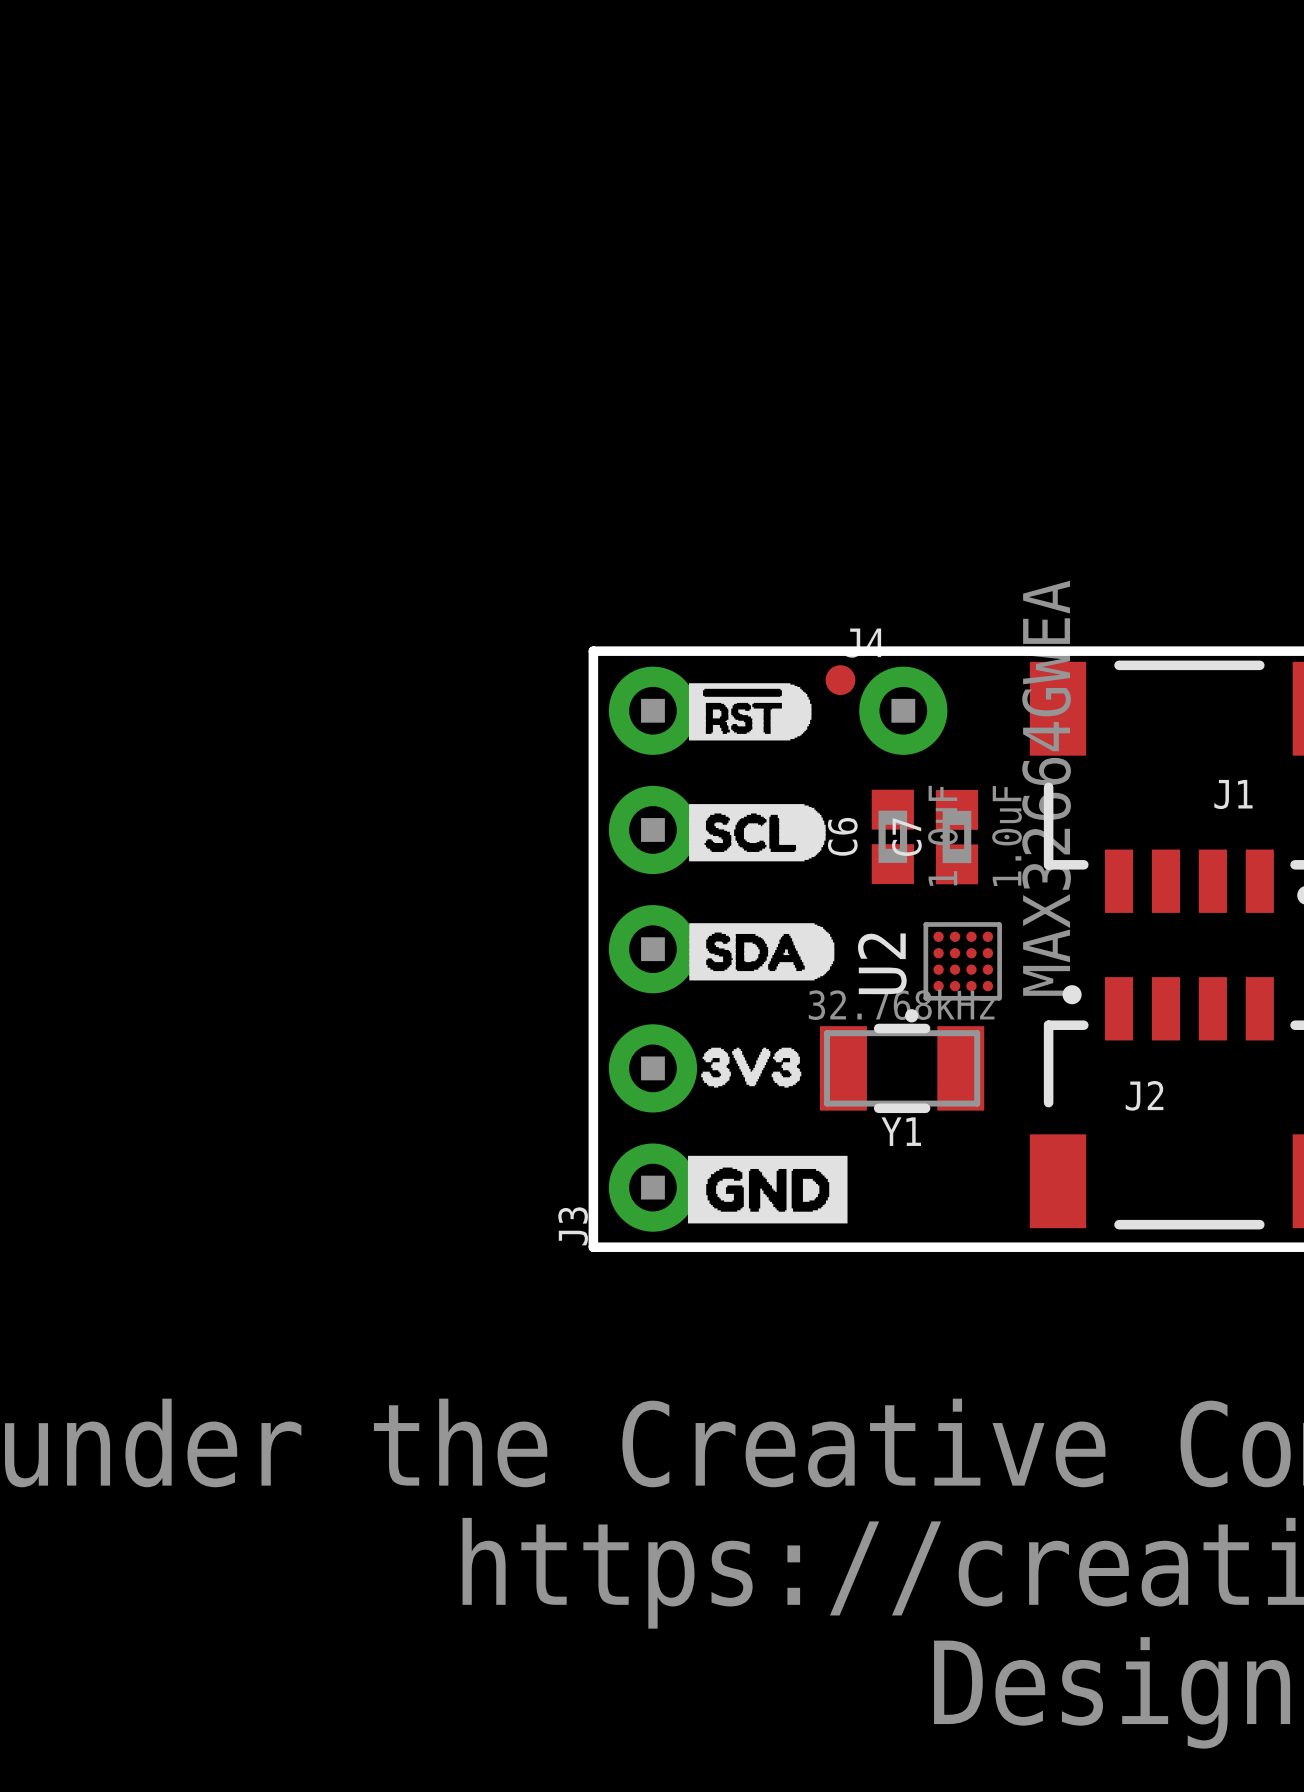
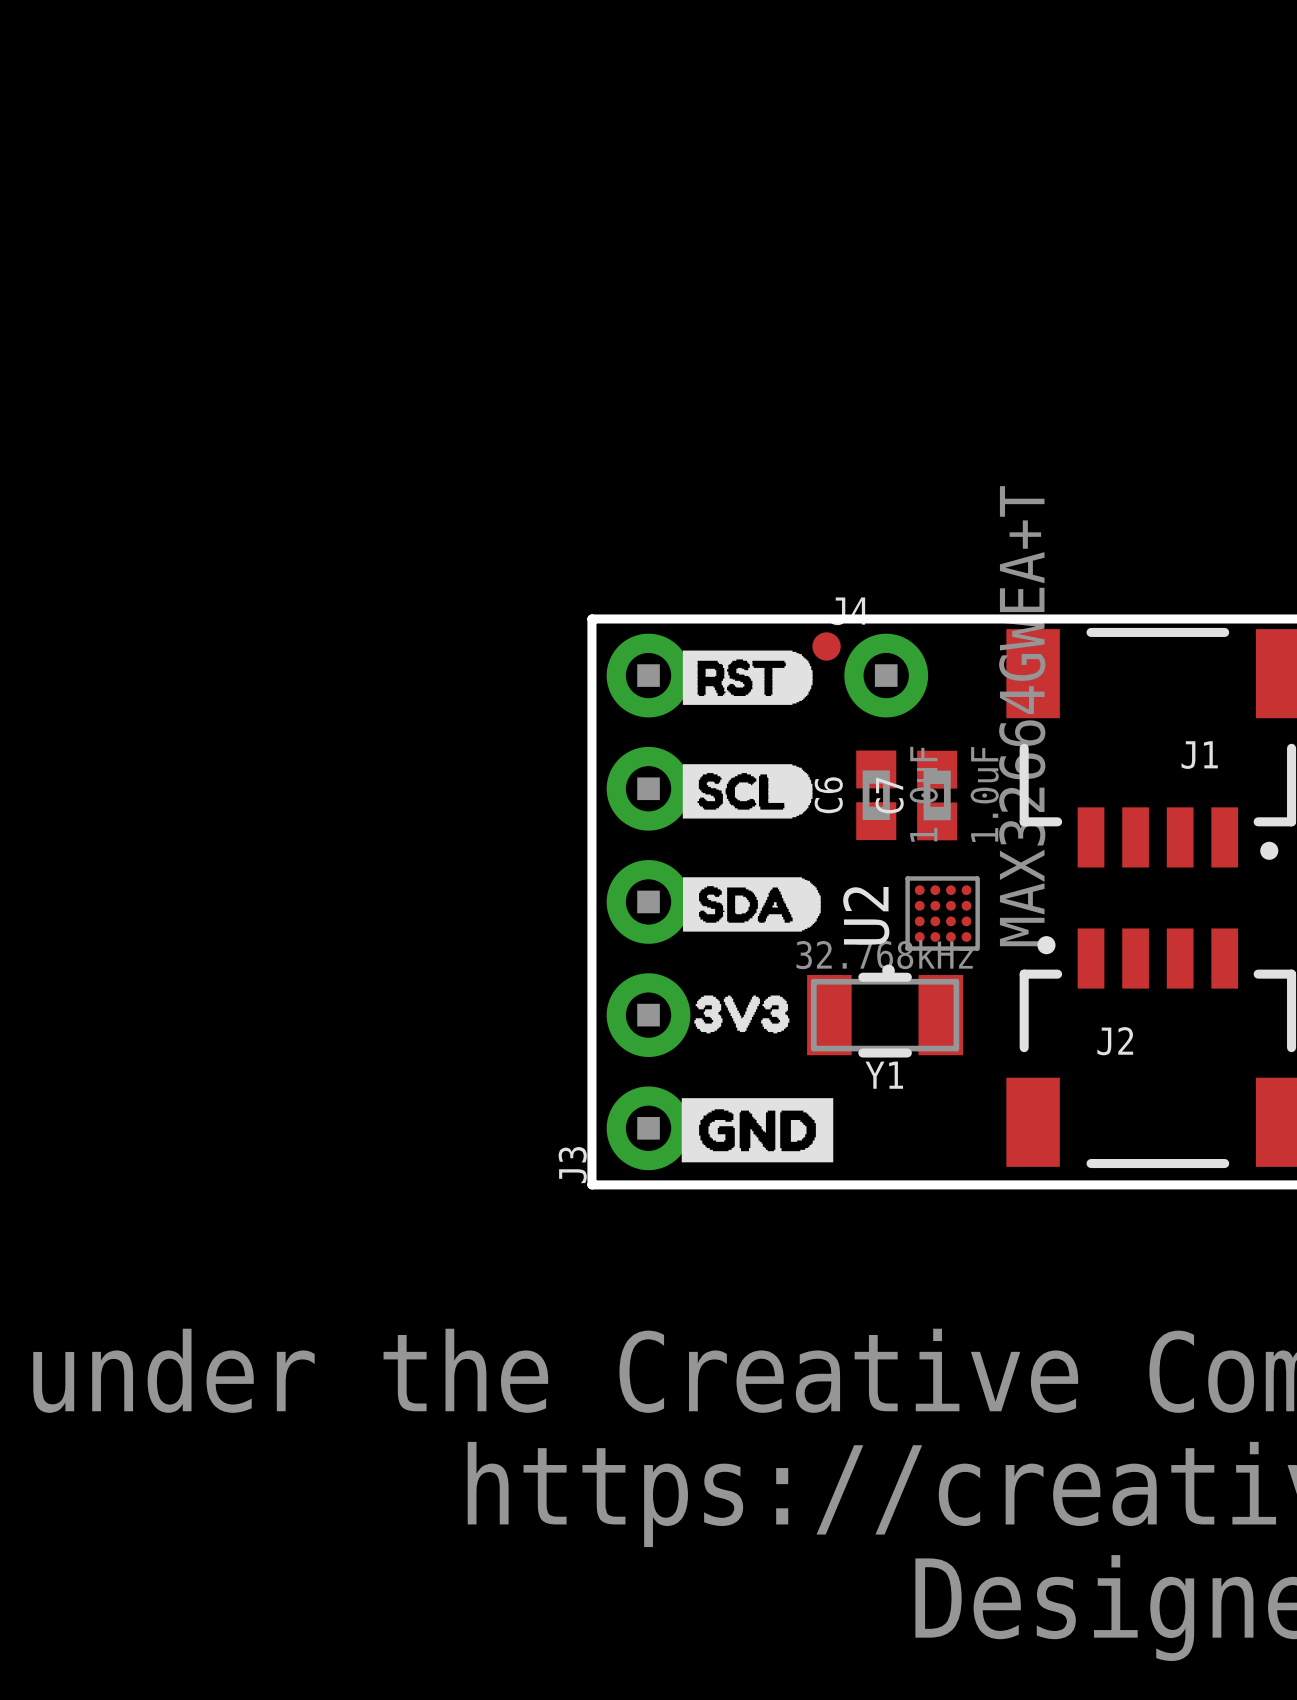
drawing shape: [688, 683, 812, 741] -> [682, 650, 813, 705]
U2 value: MAX32664GWEA (1046, 788) -> MAX32664GWEA+T (1022, 716)
U2 footprint: [905, 922, 1002, 1023] -> [882, 876, 980, 978]

